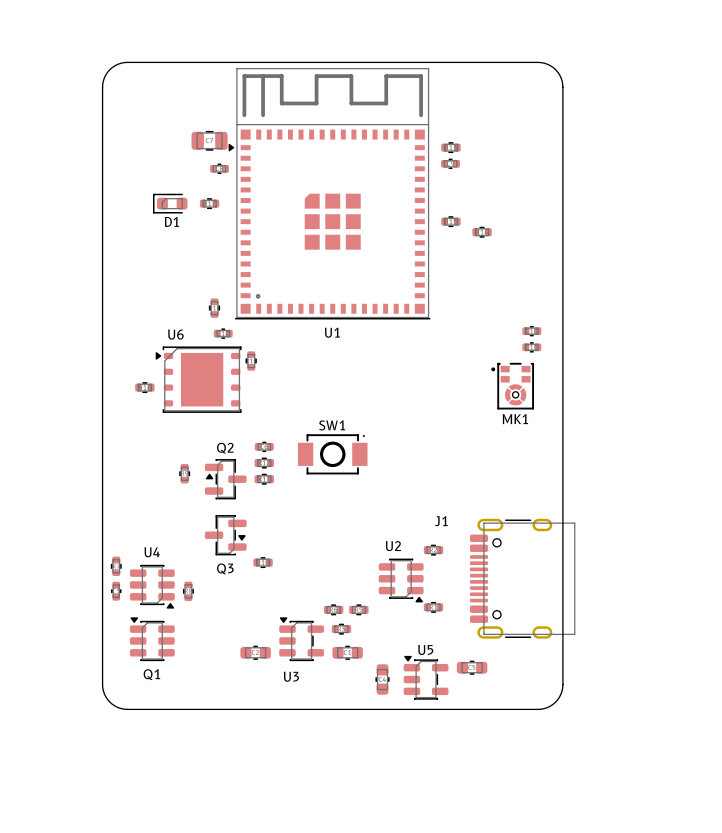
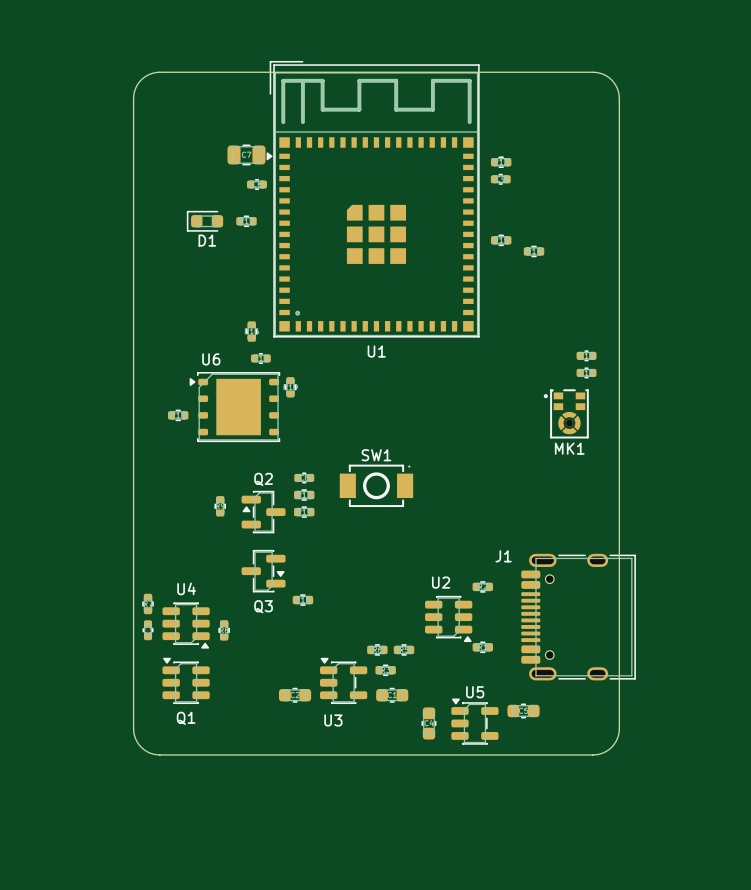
U1 footprint: [228, 68, 431, 320] -> [266, 60, 480, 338]
MK1 footprint: [491, 362, 534, 410] -> [543, 389, 589, 439]
J1 footprint: [469, 518, 576, 639] -> [521, 553, 636, 681]

